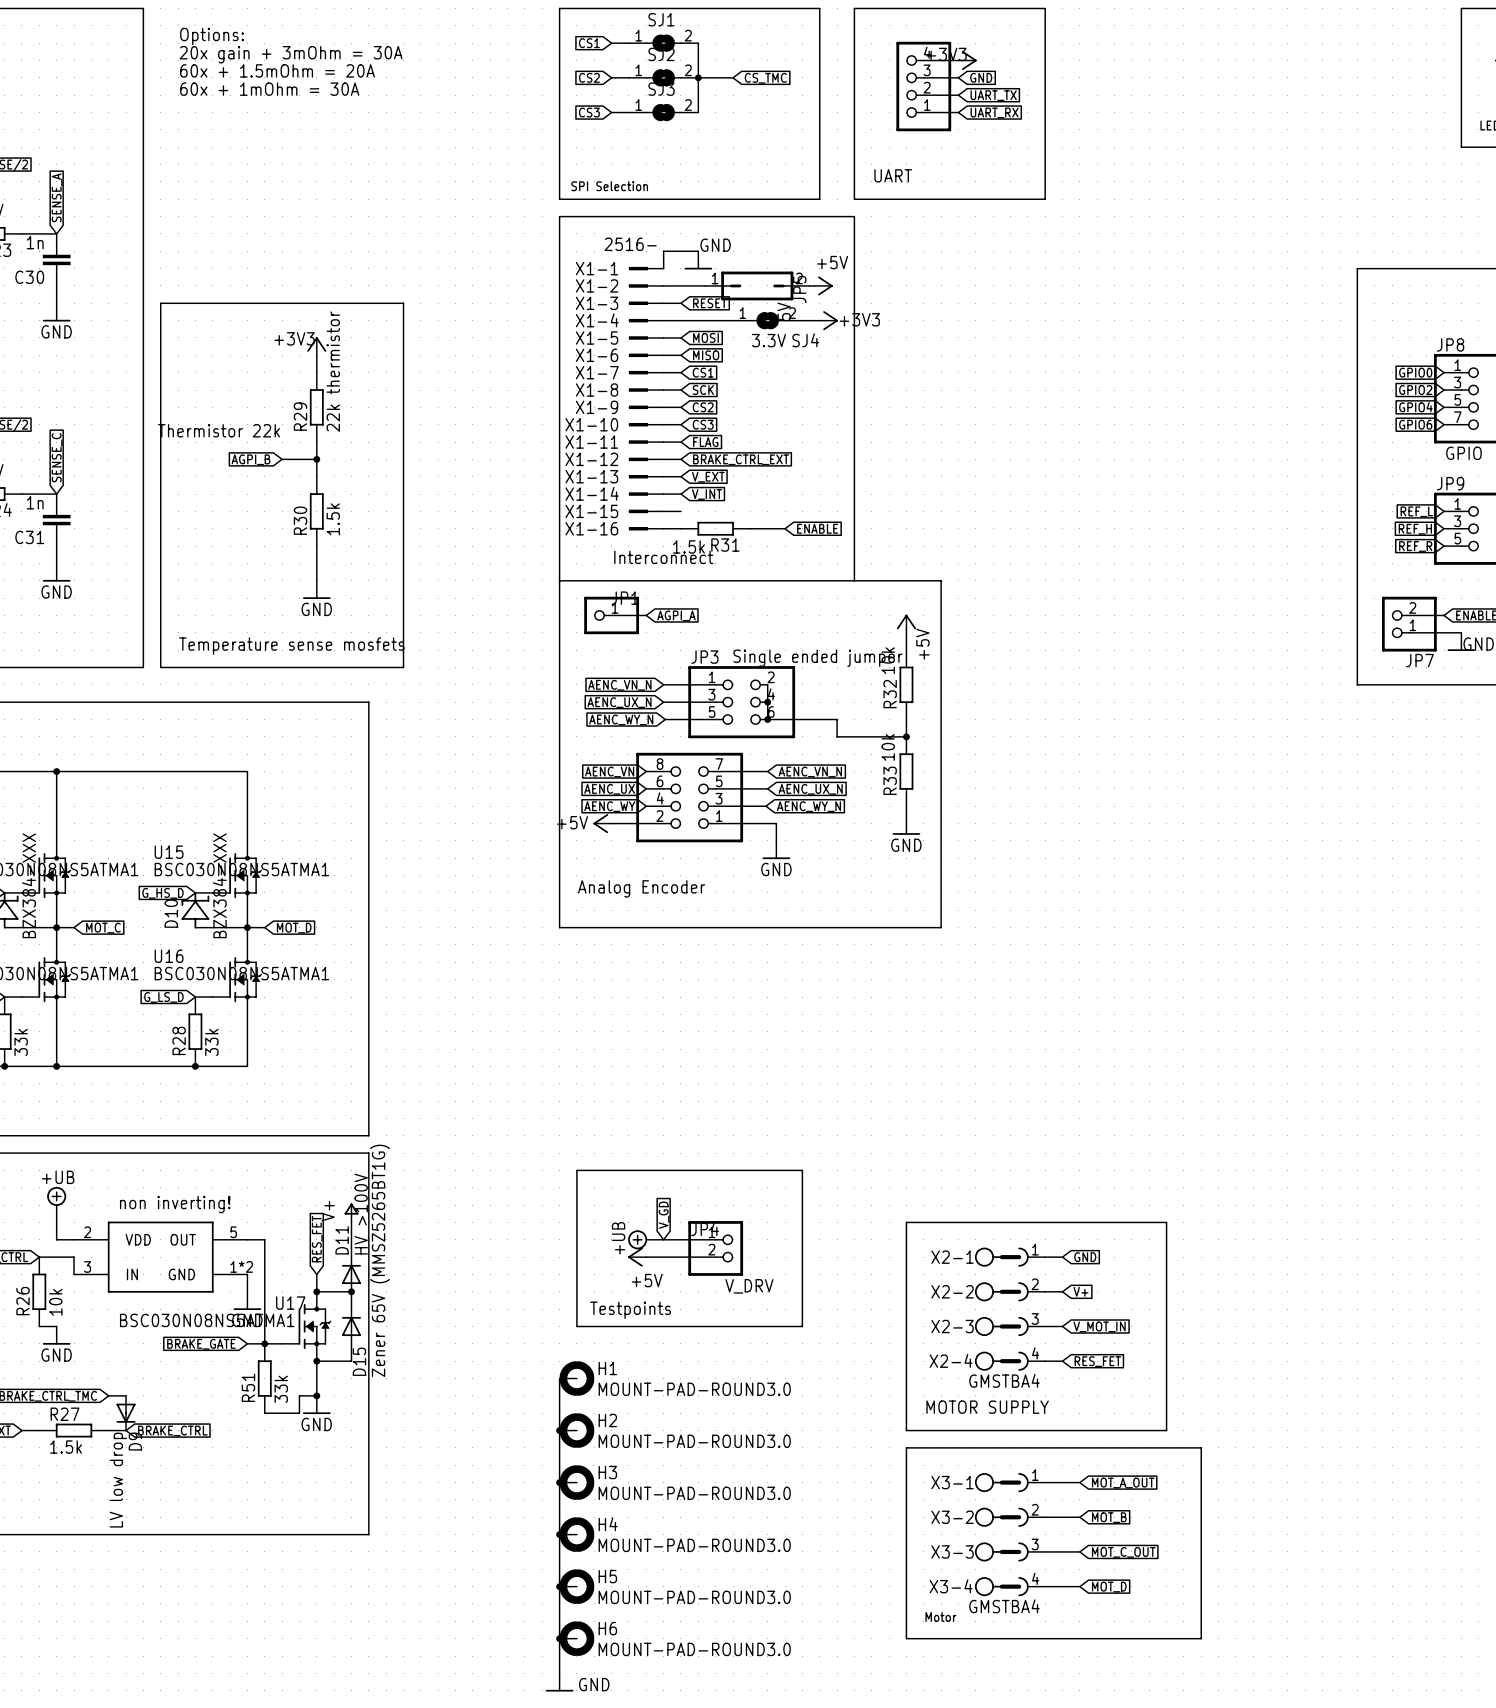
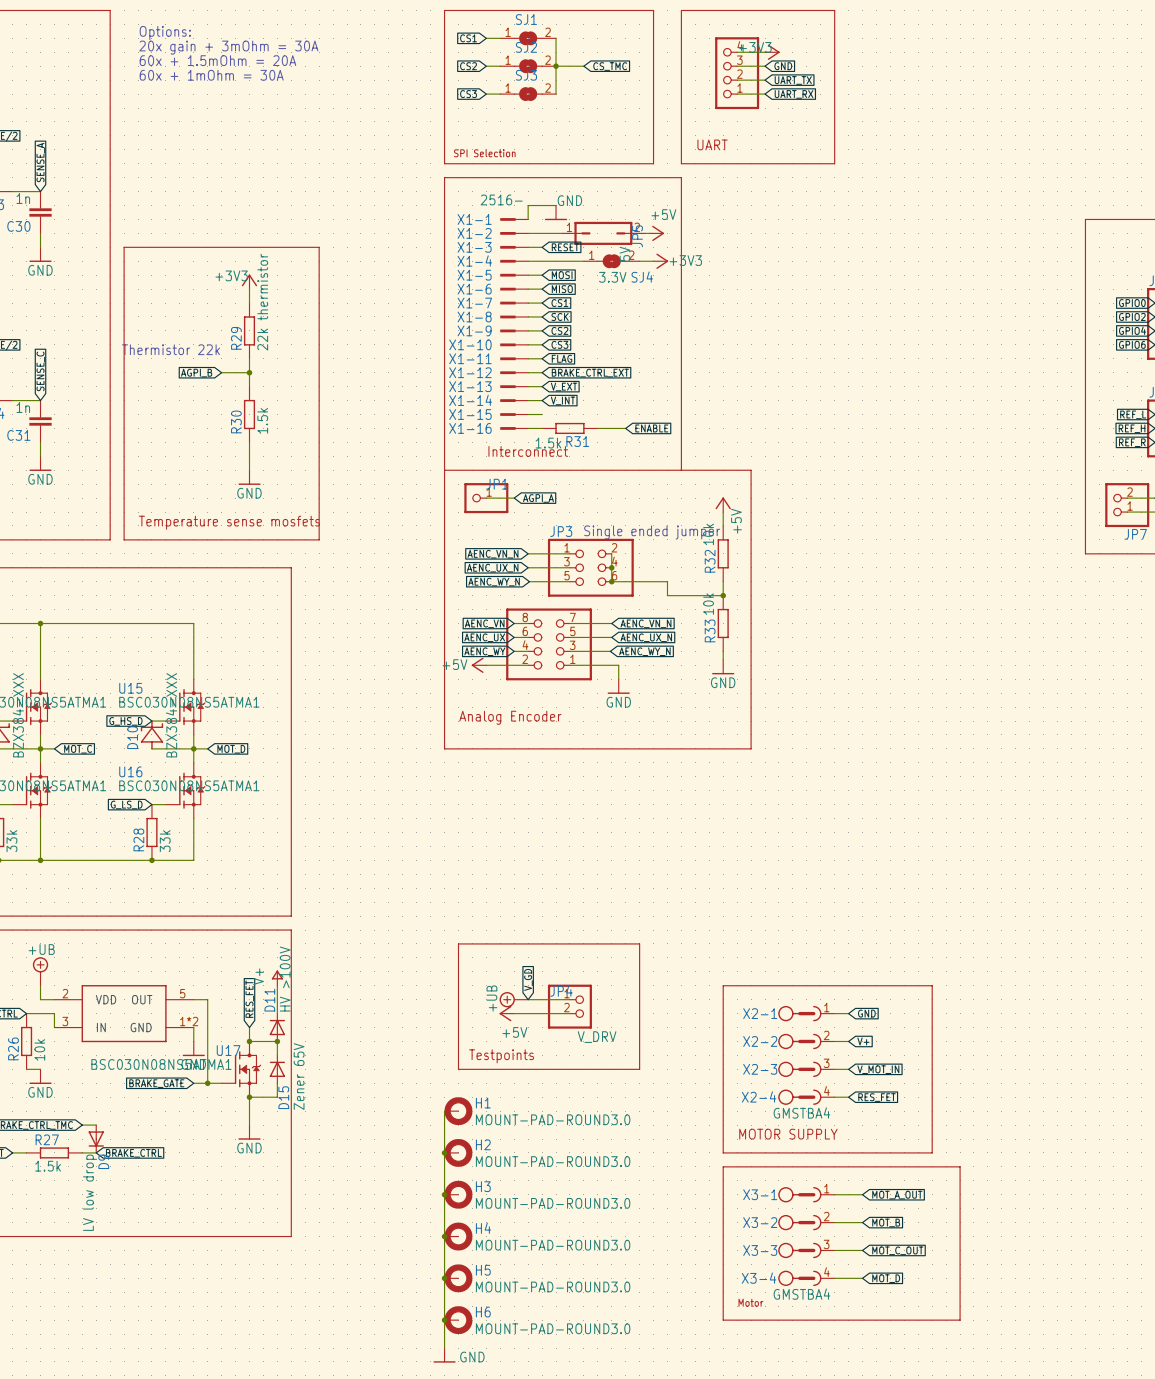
text: non inverting! (175, 1204) -> none
D15 value: Zener 65V (MMSZ5265BT1G) (379, 1260) -> Zener 65V (299, 1076)
R51: 33k (264, 1378) -> none
wire: (316, 1395) (299, 1395) (299, 1413) (264, 1413) -> none
junction: (316, 1395) -> none

